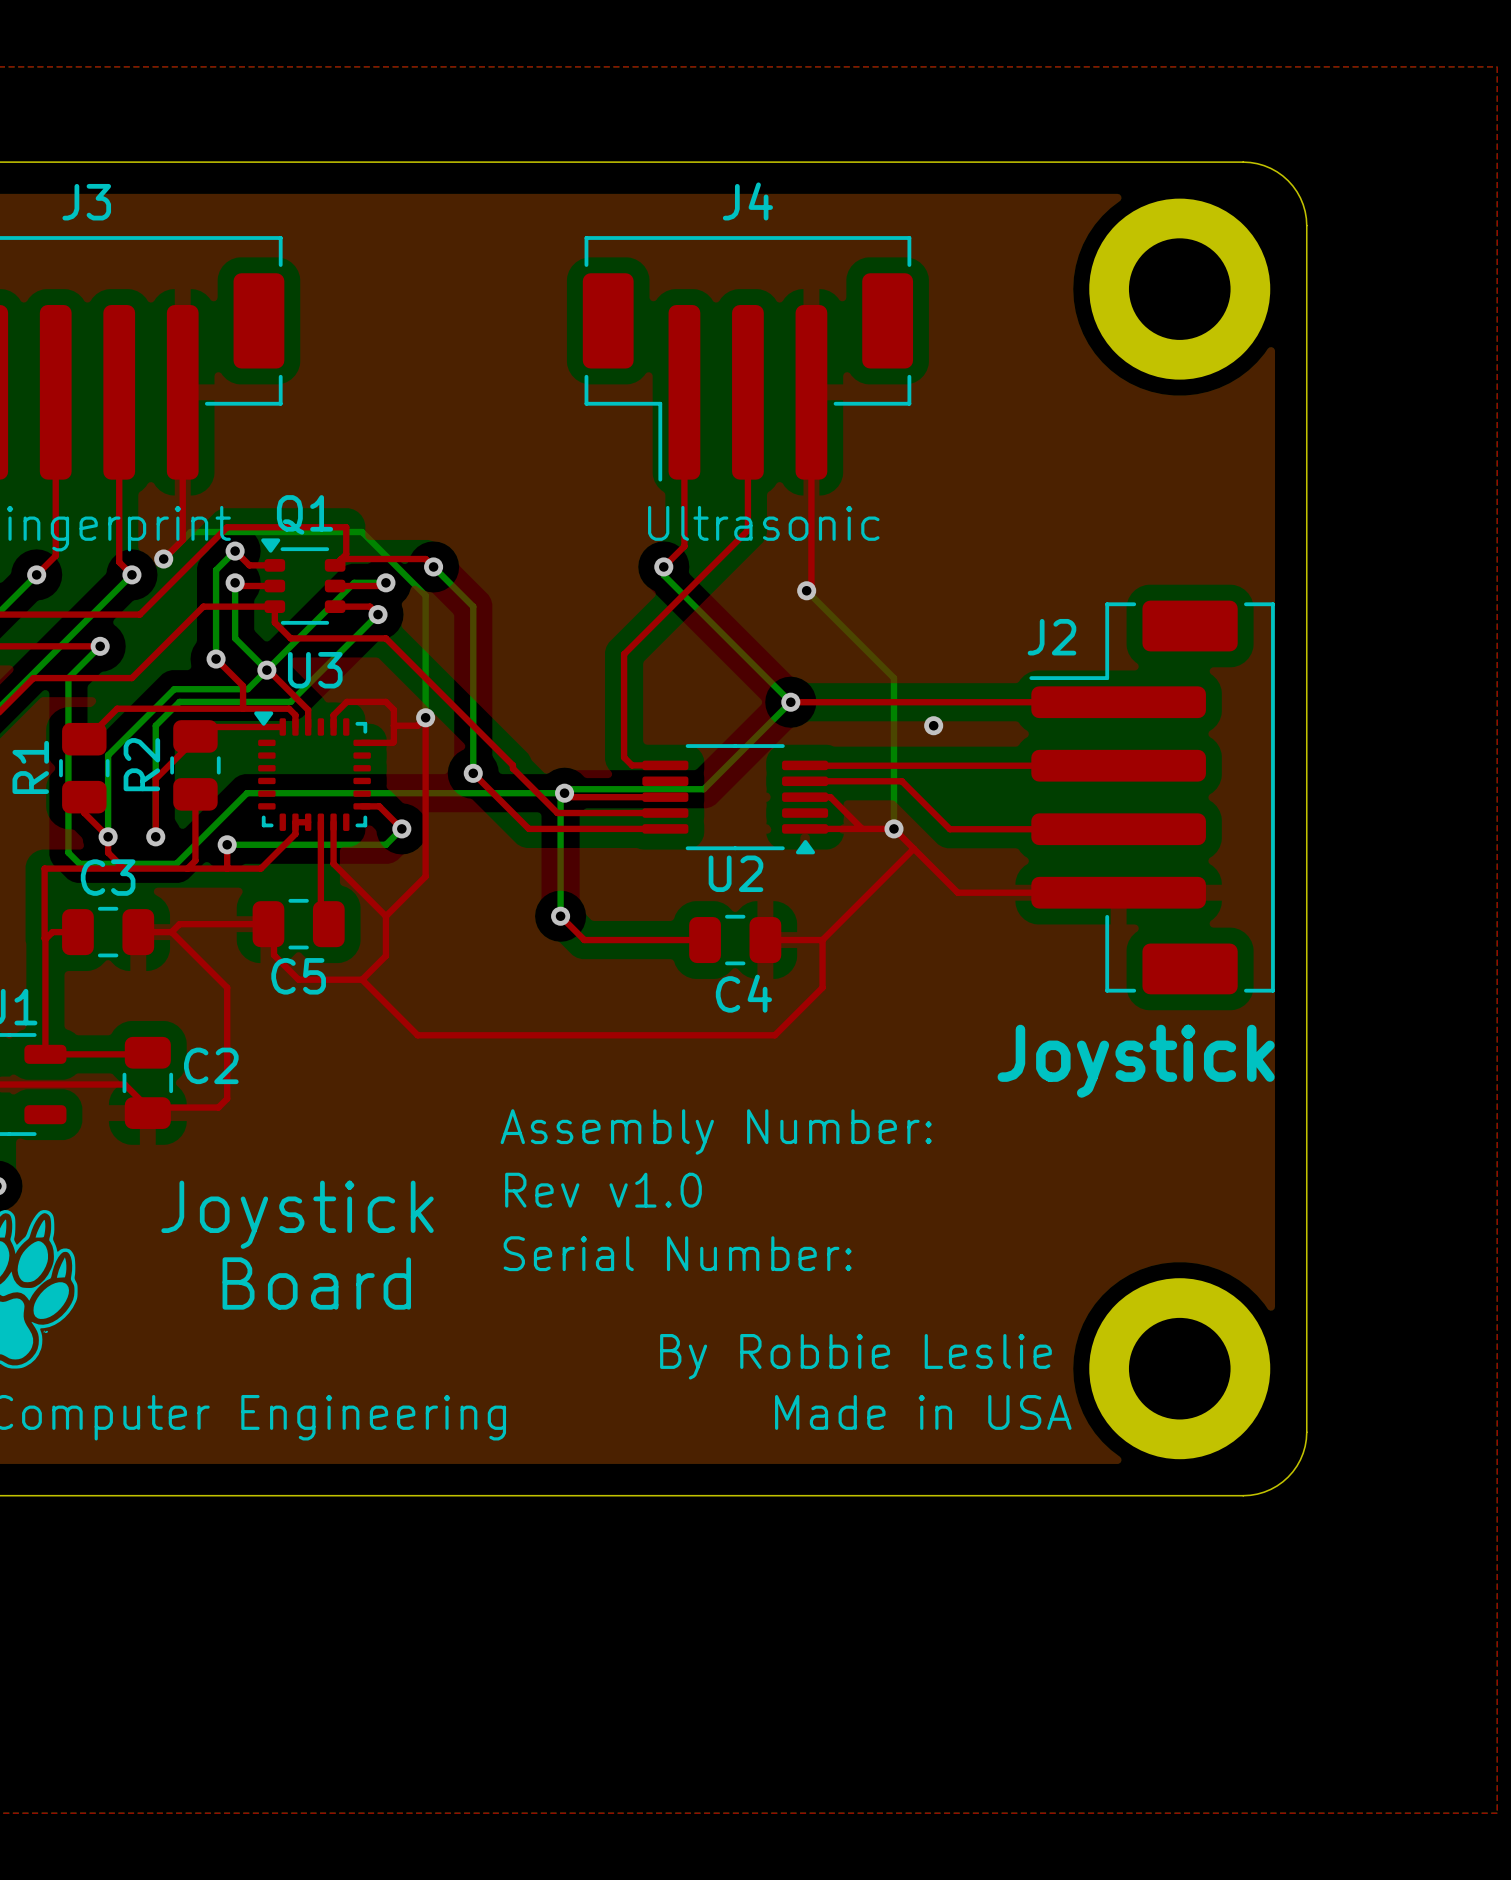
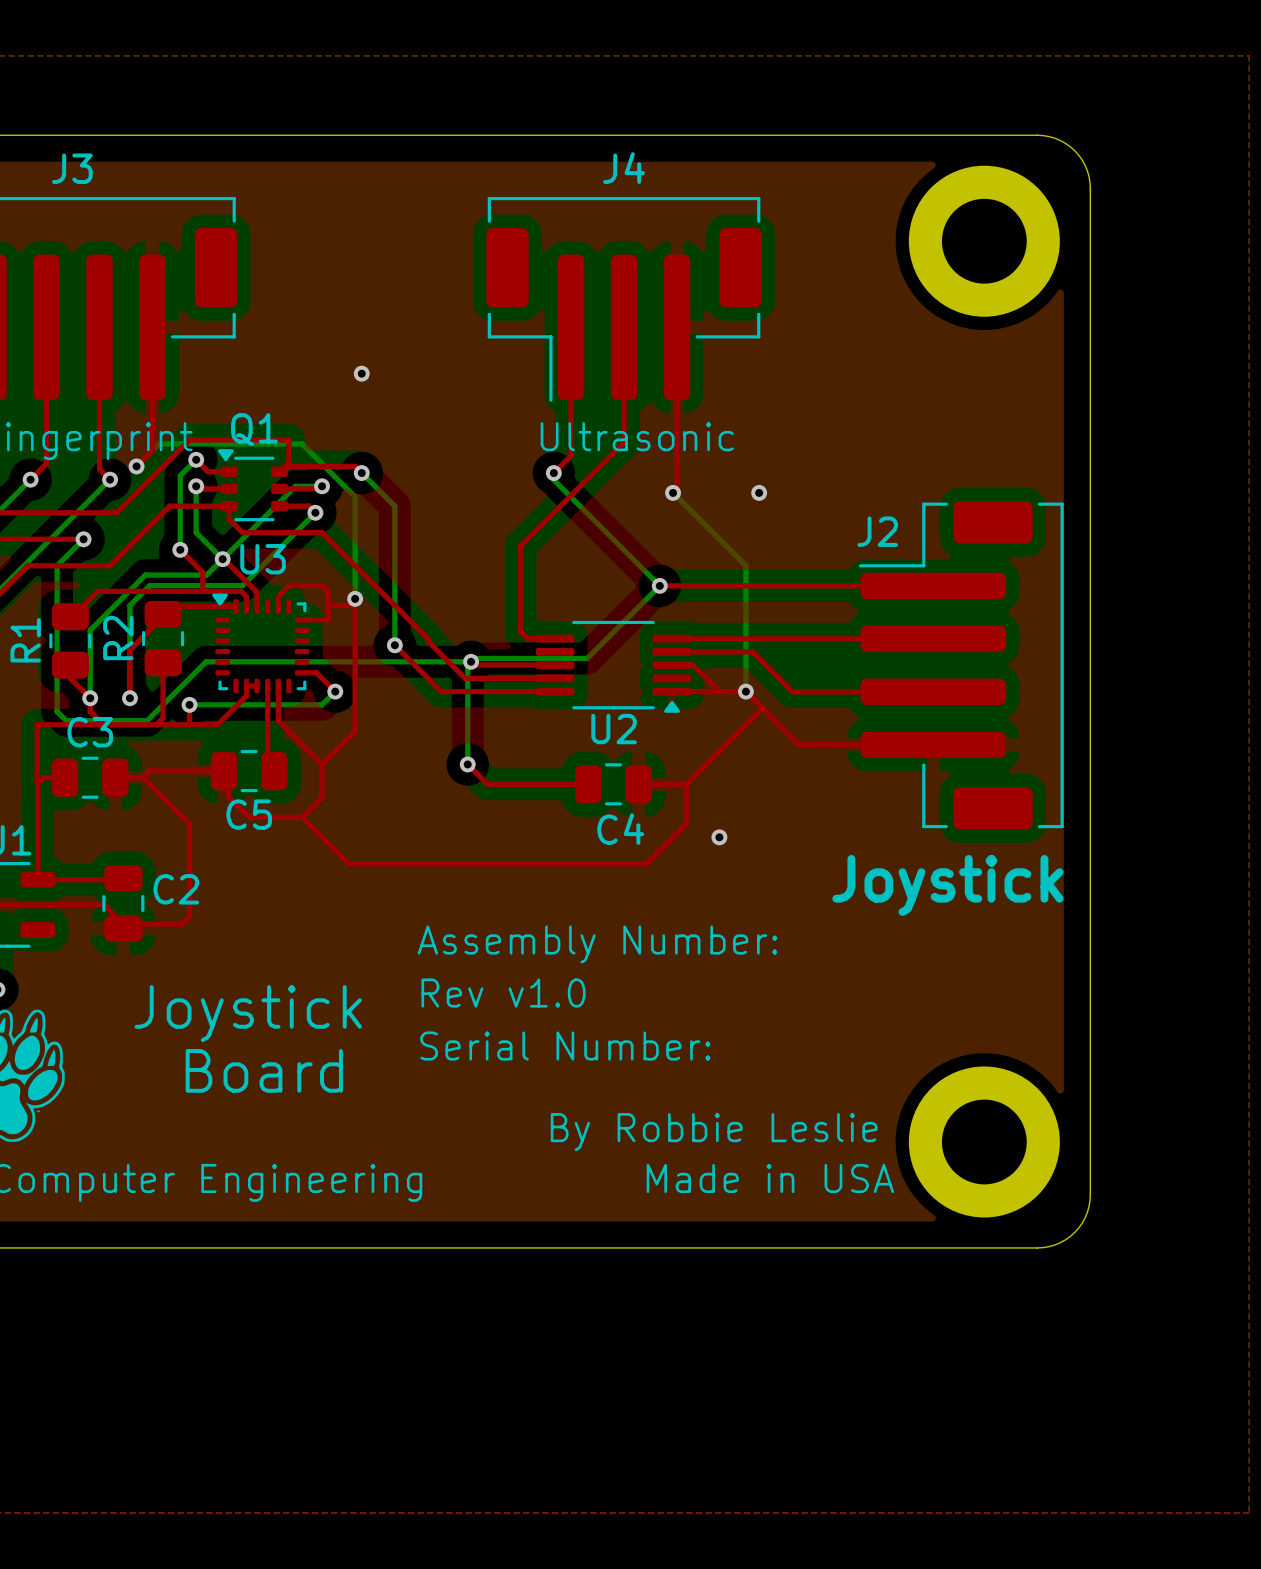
via: none -> (361, 373)
via position: (933, 725) -> (759, 492)
via: none -> (719, 837)

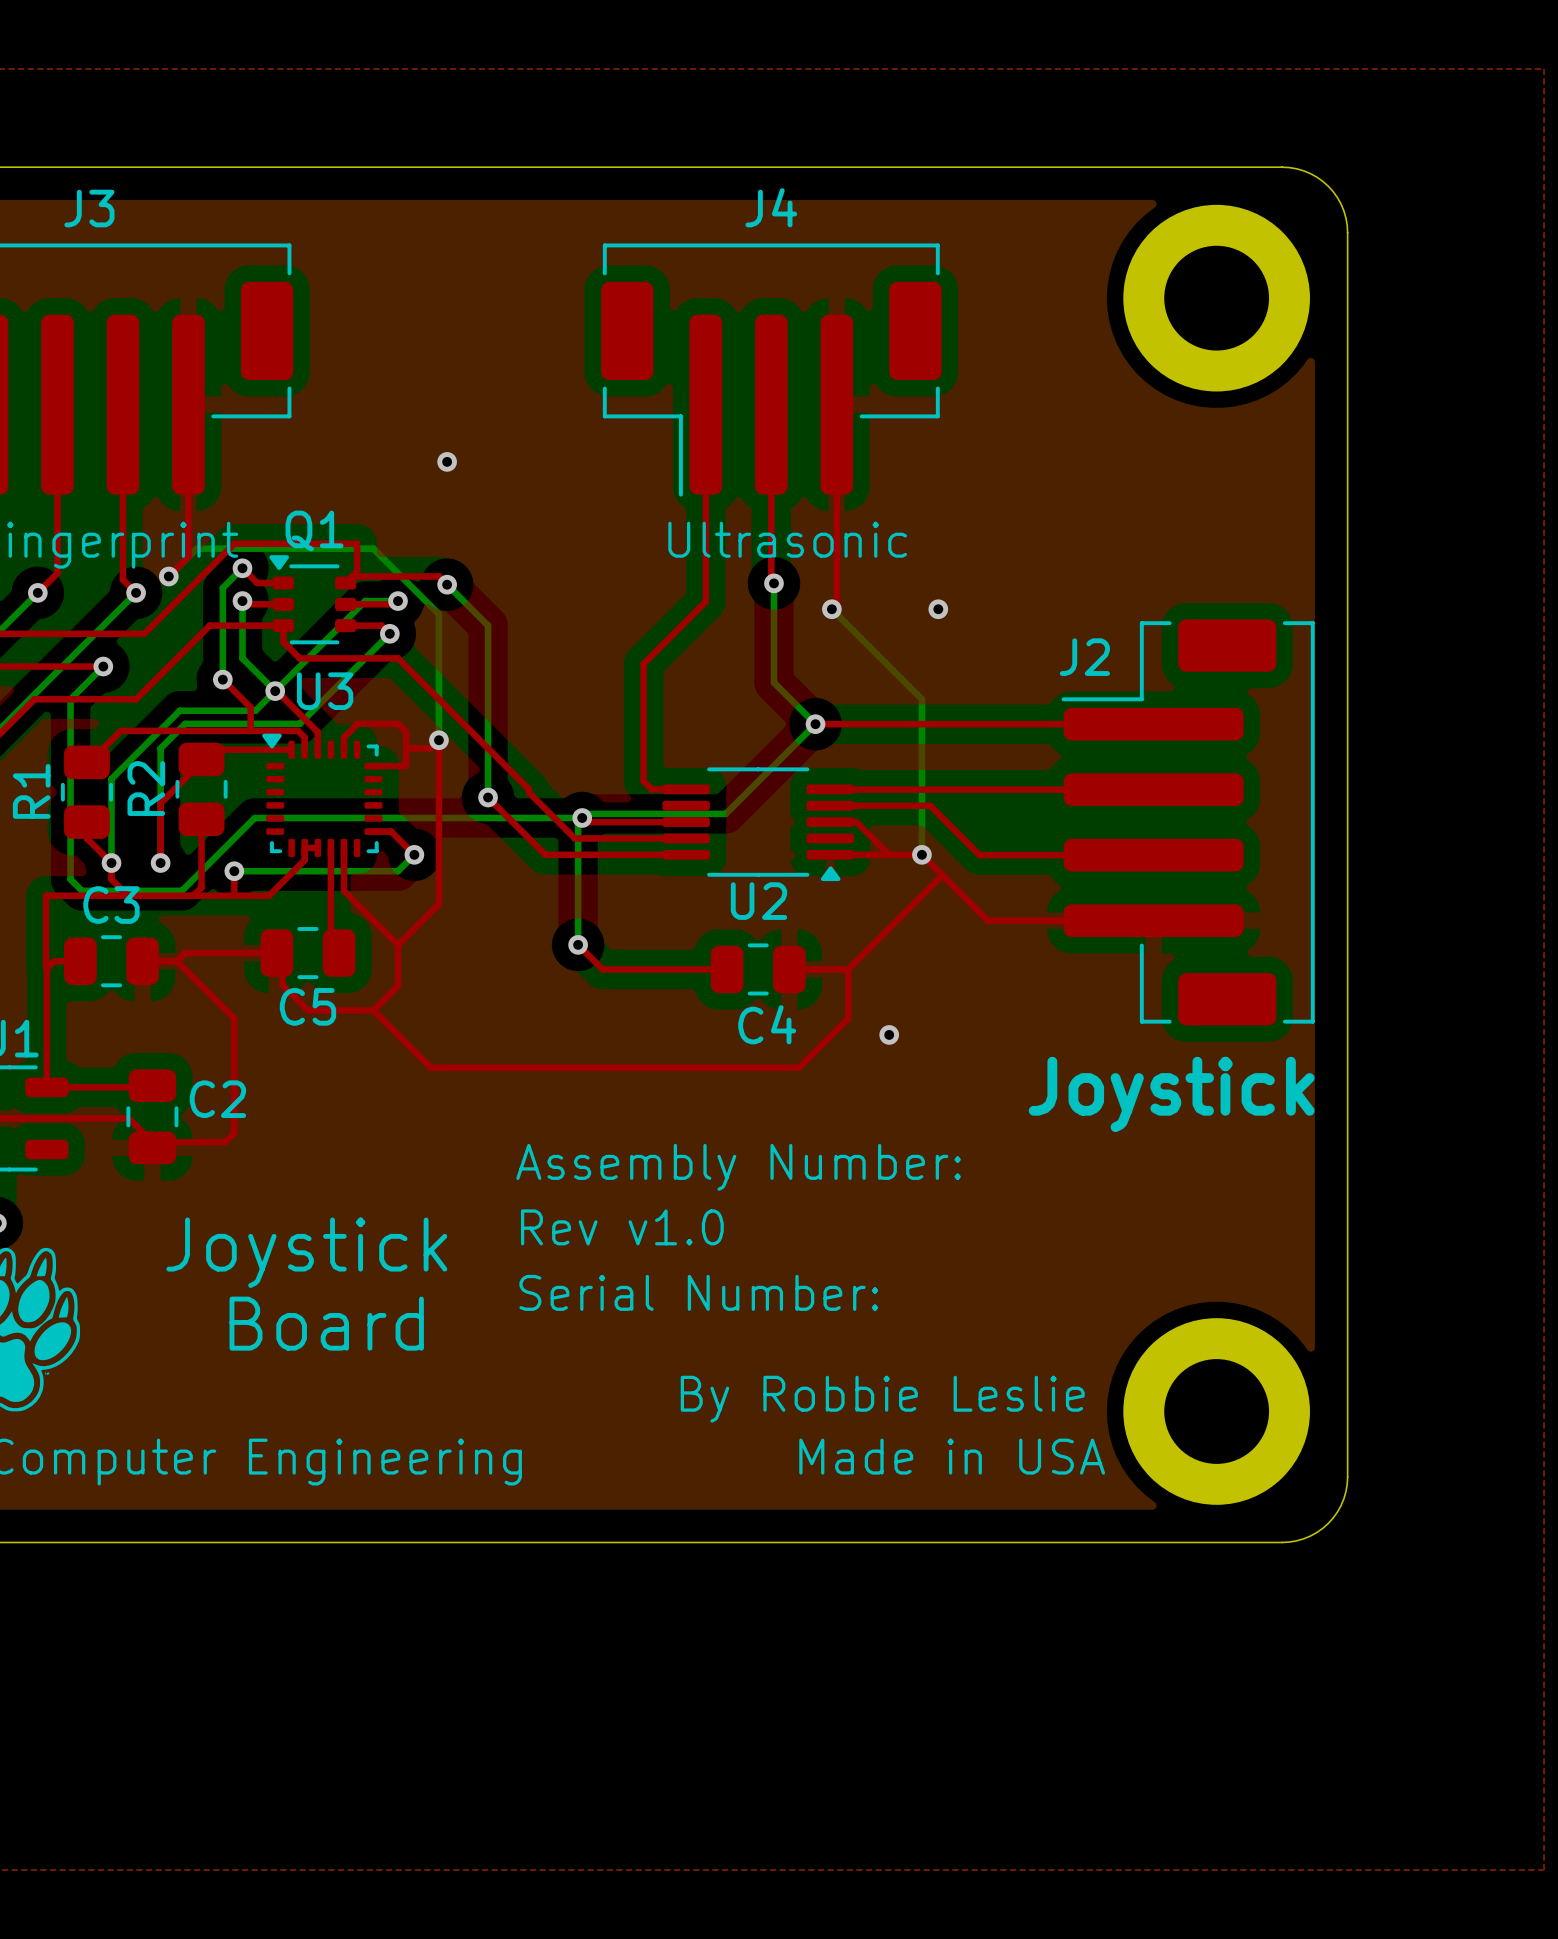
top track: (624, 442) (520, 545) -> (705, 563) (705, 601) (643, 663) (643, 674)
top track: none -> (771, 547) (771, 580) (774, 583)
top track: (571, 455) (553, 473) -> none
bottom track: (553, 473) (553, 479) (626, 552) -> (774, 583) (774, 682)
via position: (553, 473) -> (774, 583)

